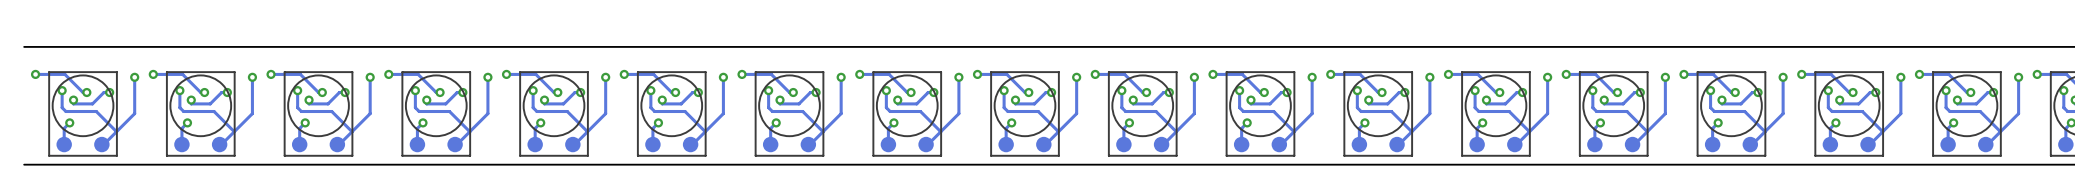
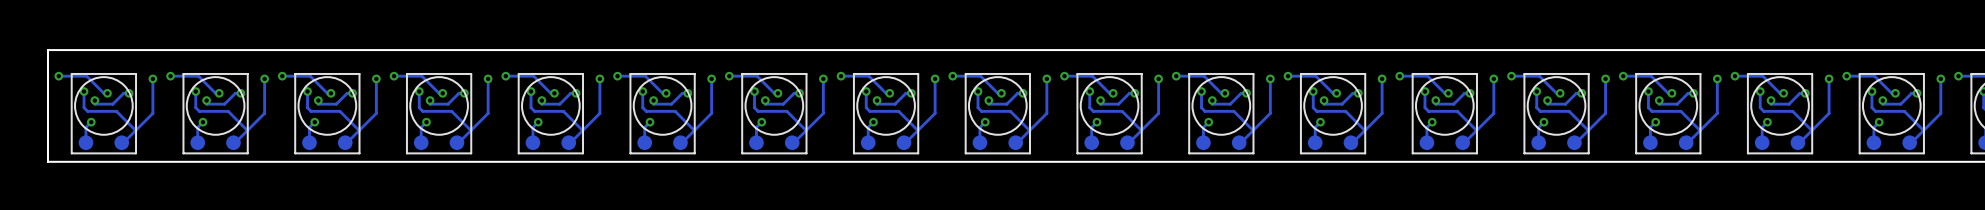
board edge: none -> (47, 50) (47, 161)

